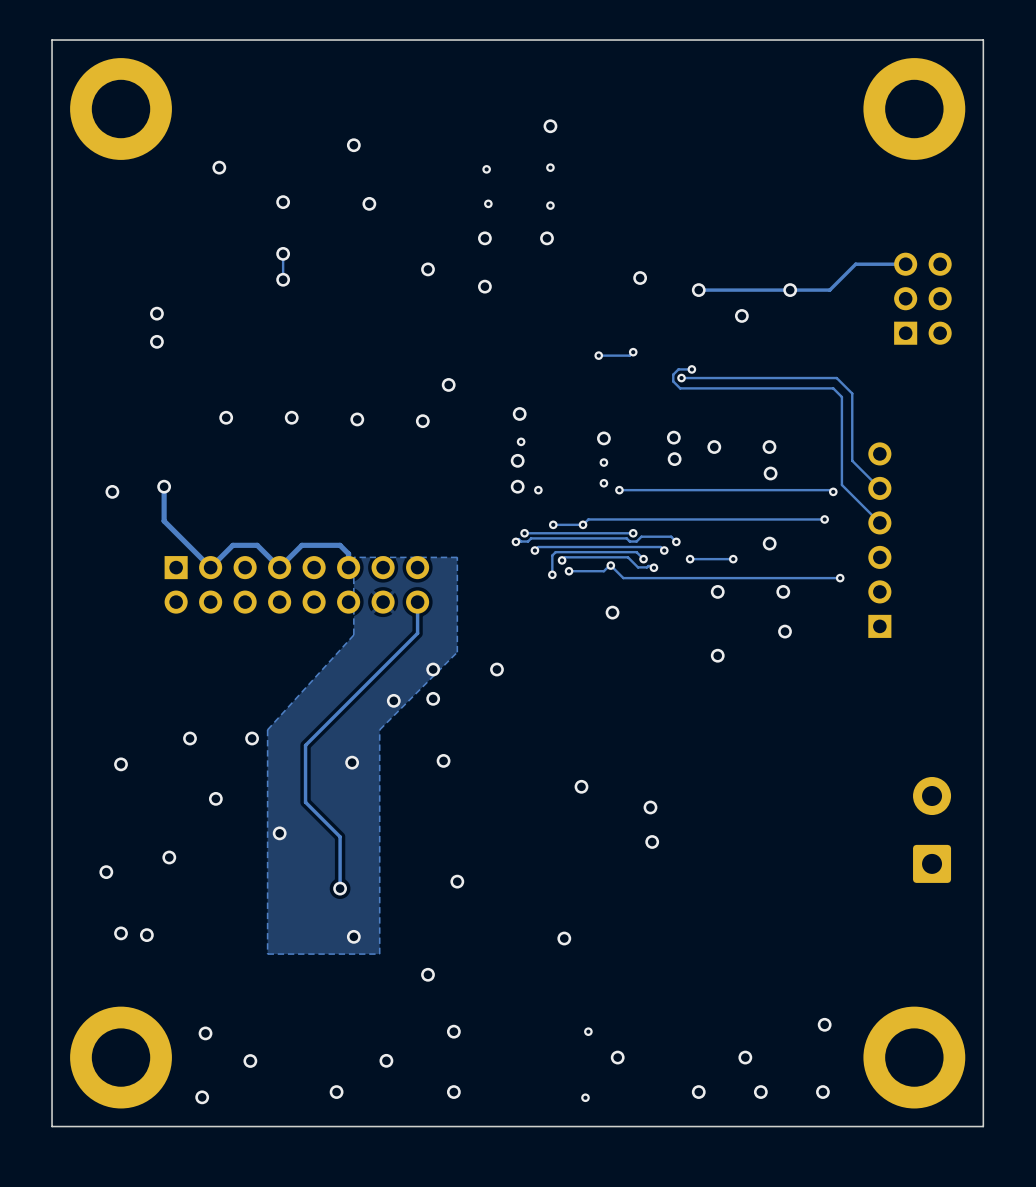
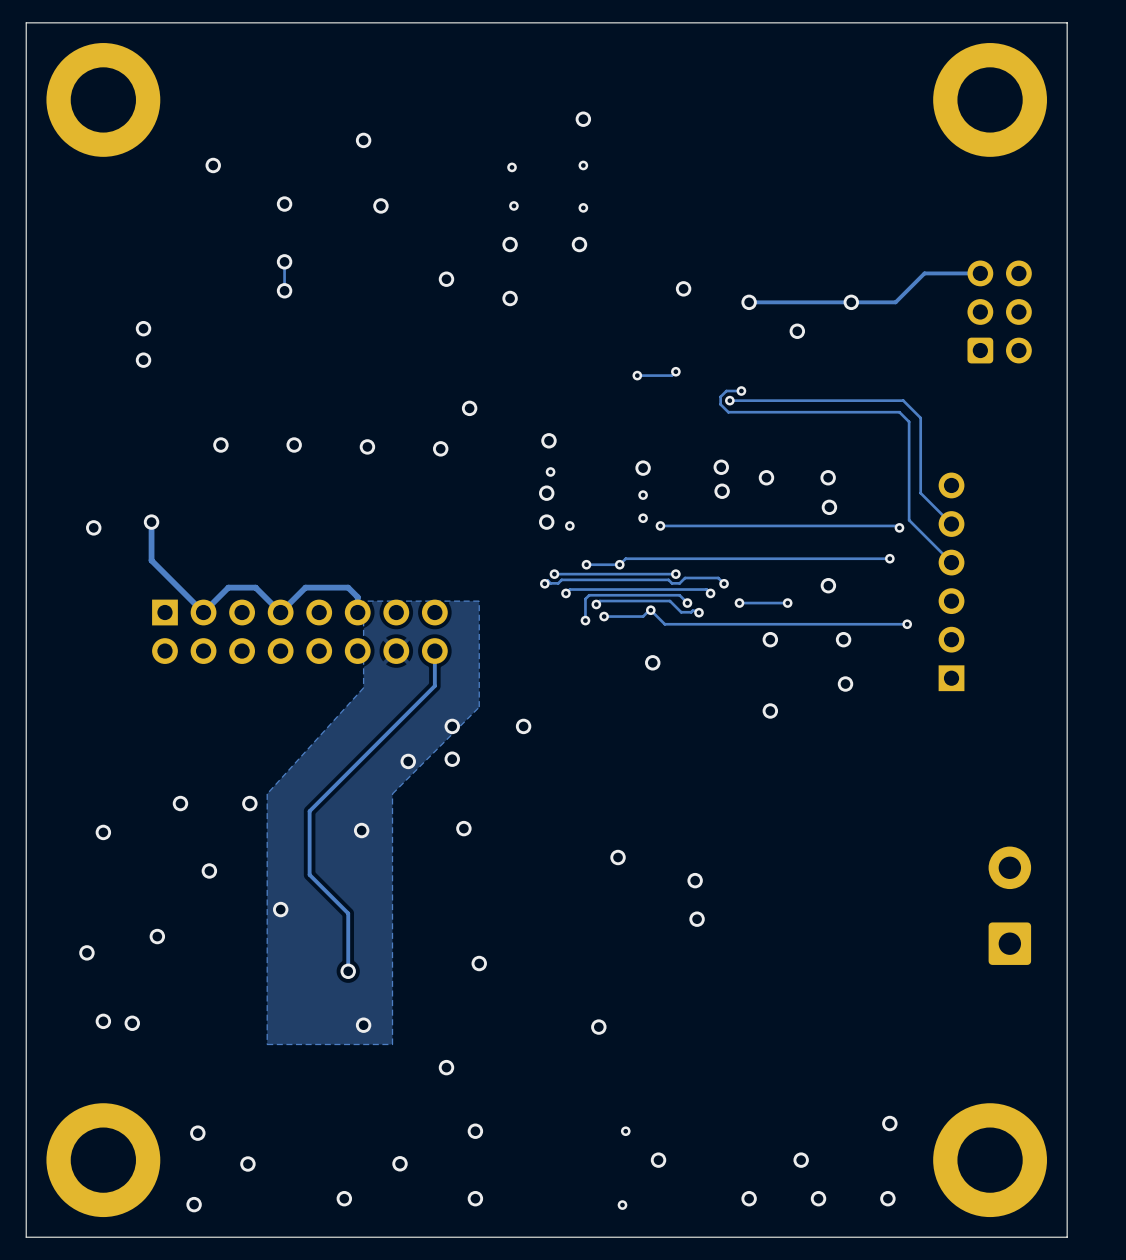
part footprint: [894, 252, 952, 345] -> [967, 260, 1032, 364]

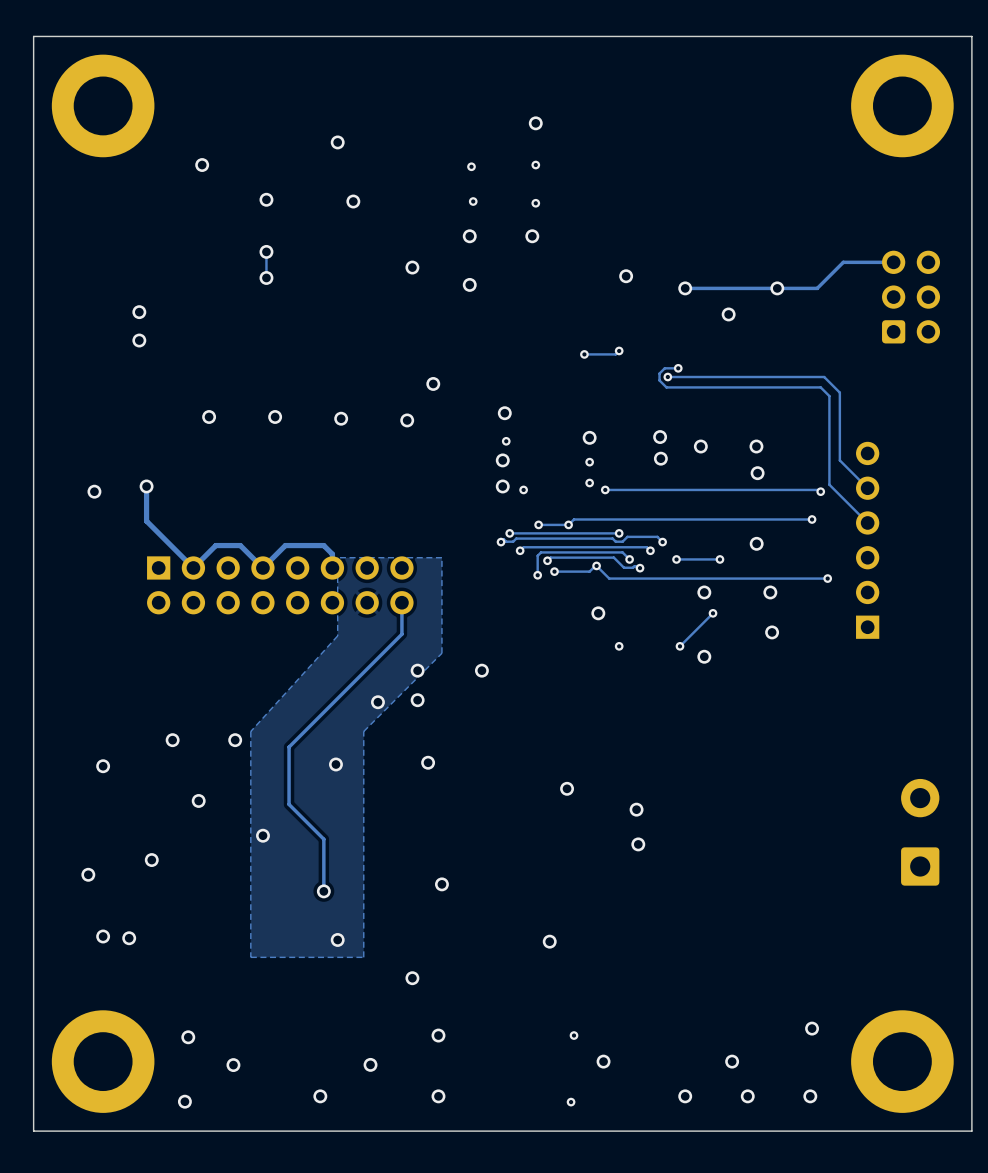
track: none -> (713, 613) (679, 646)
via: none -> (713, 613)
via: none -> (619, 646)
via: none -> (679, 646)

